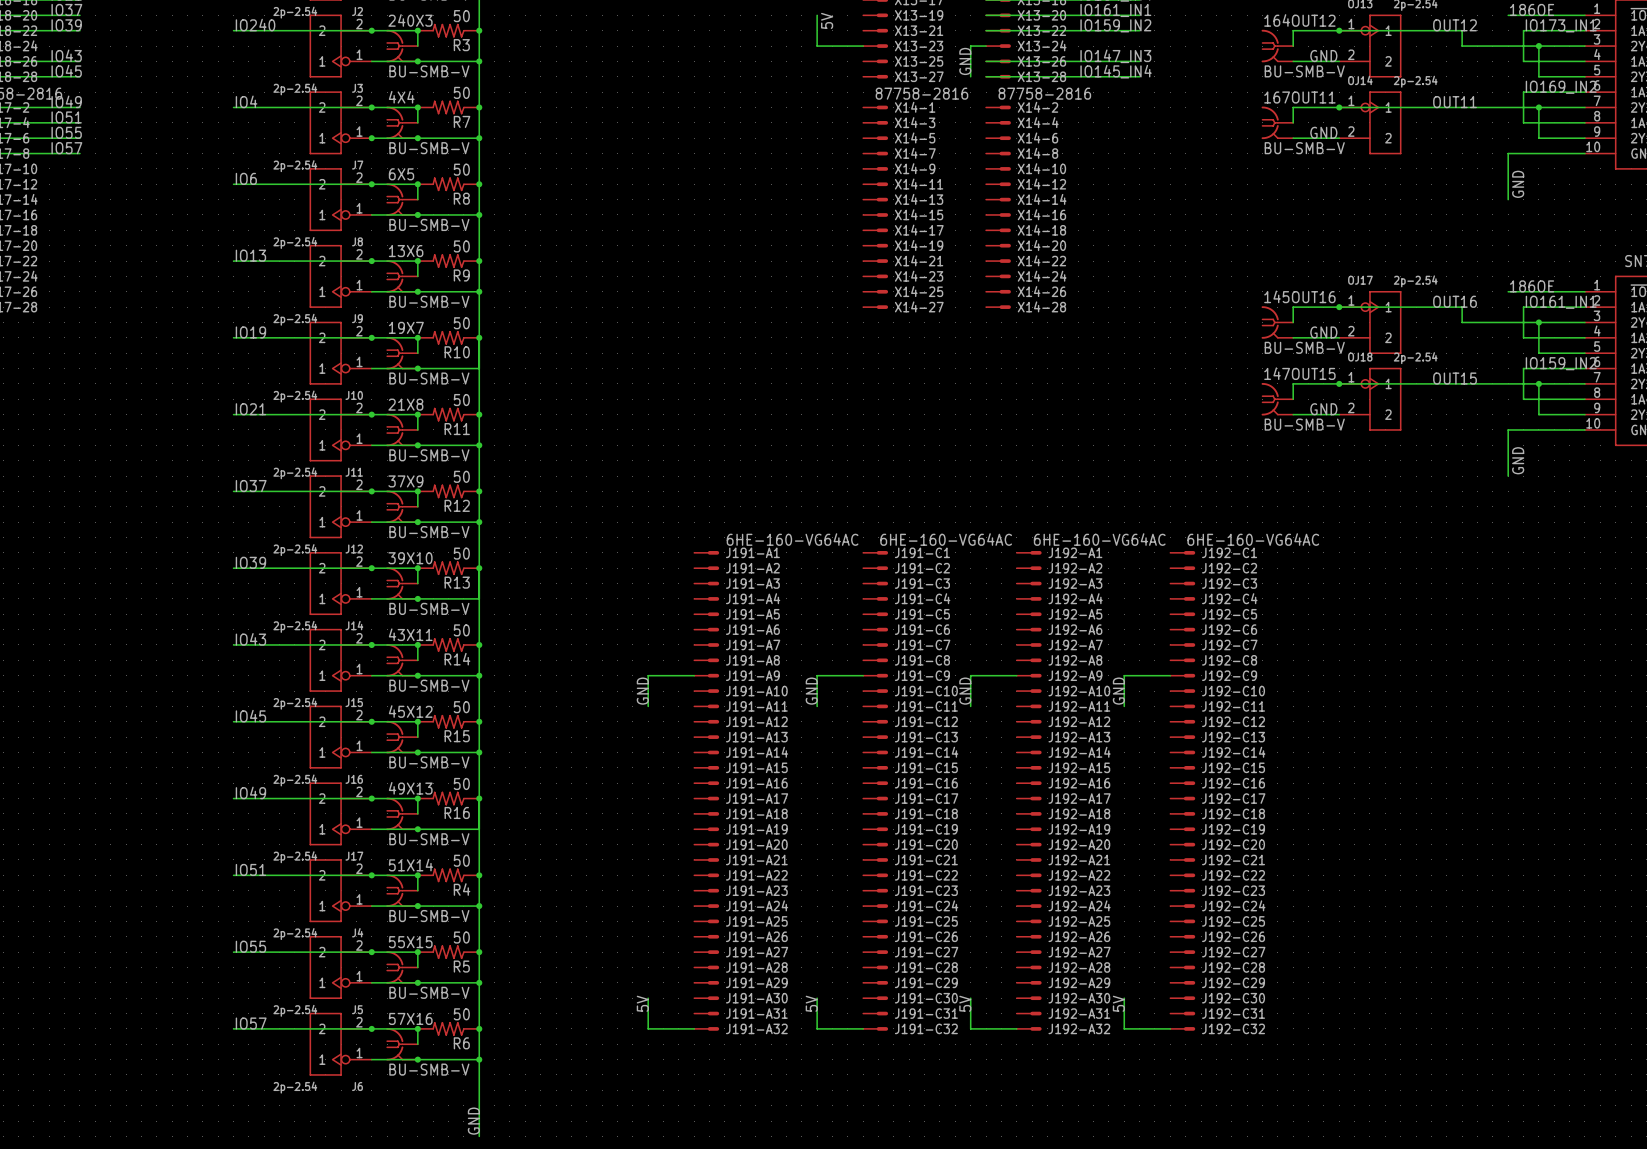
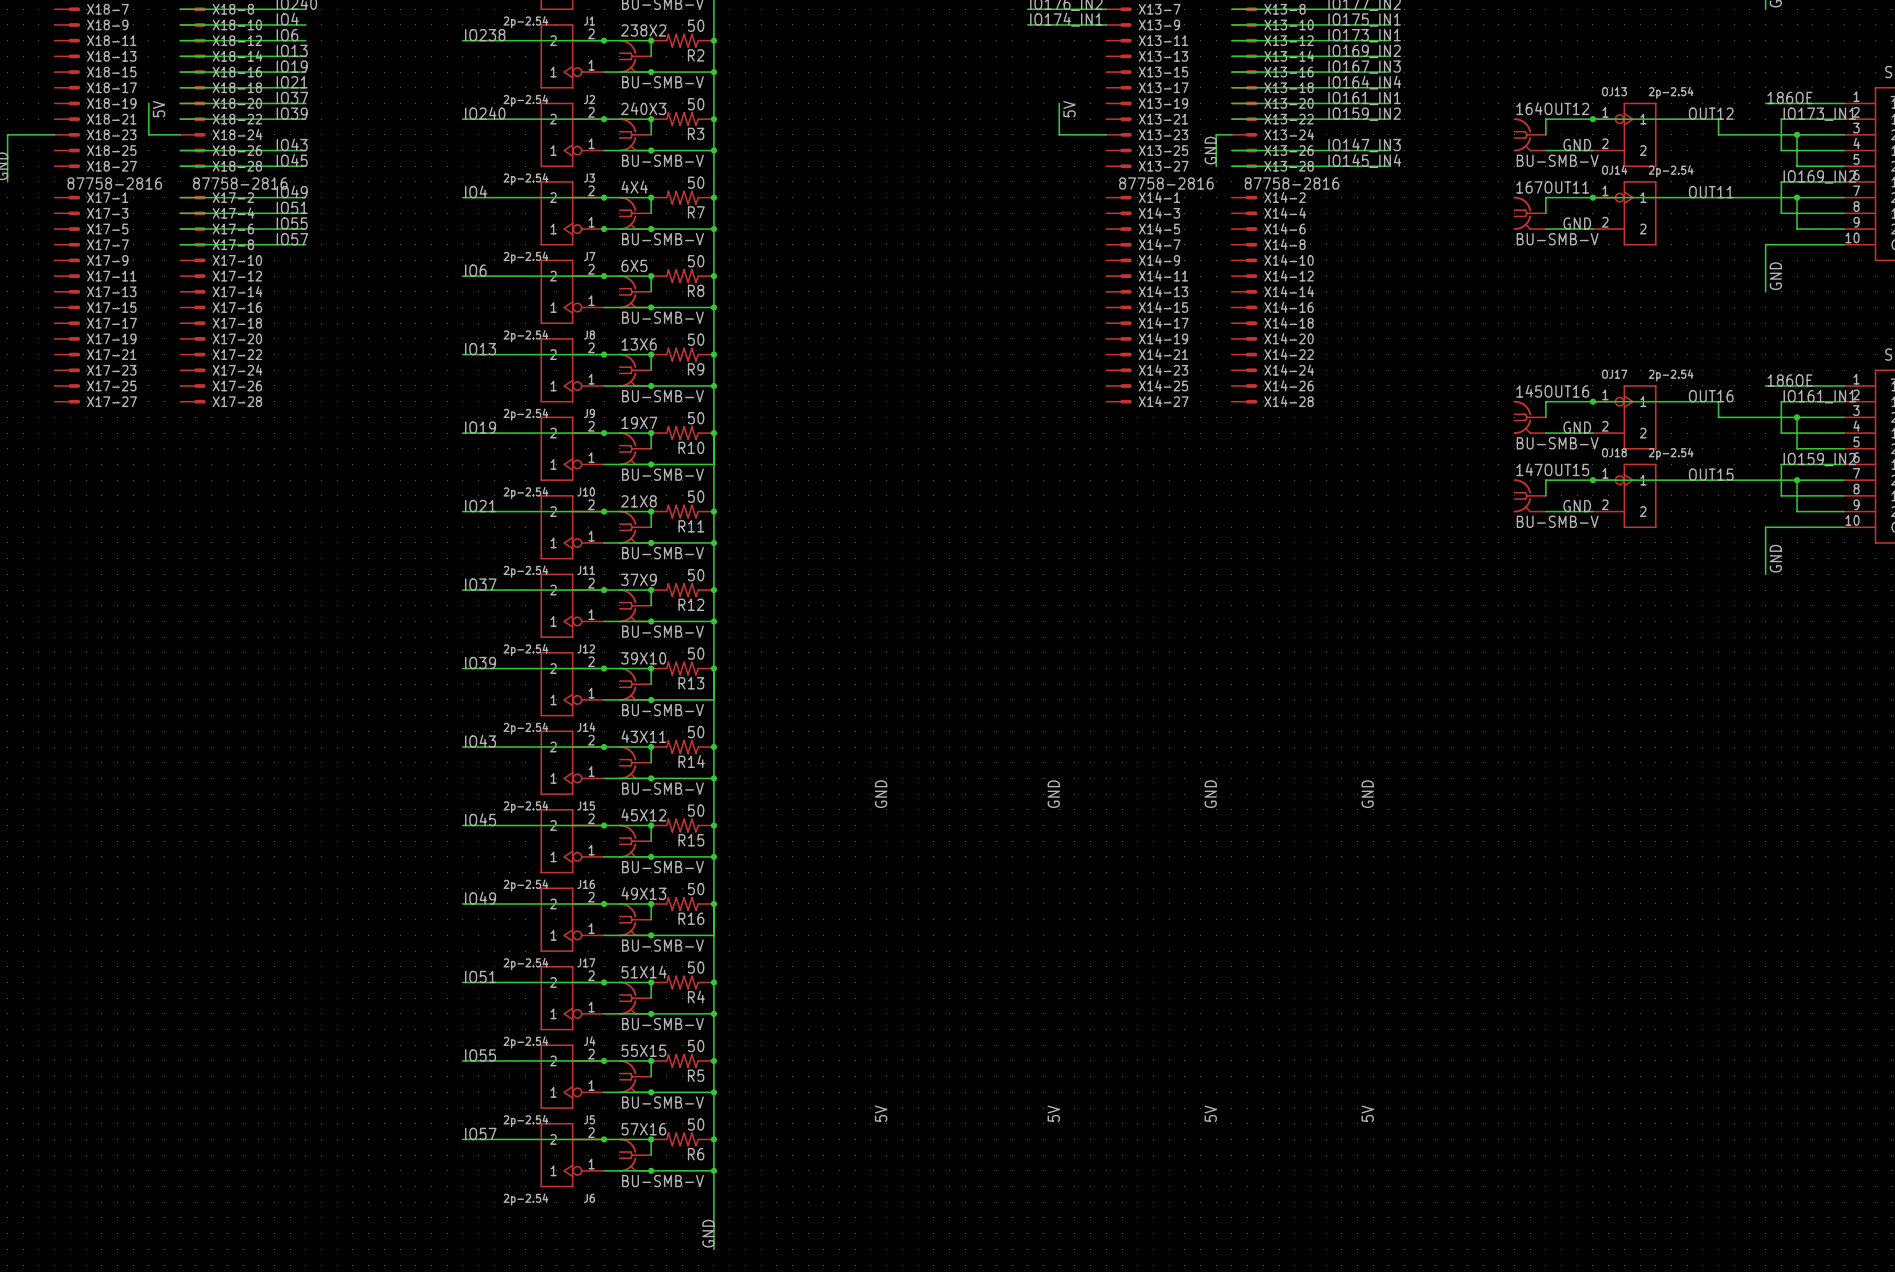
J191-A1: 6HE-160-VG64AC (706, 552) -> none
J191-C1: 6HE-160-VG64AC (875, 552) -> none
J192-A1: 6HE-160-VG64AC (1029, 552) -> none
J192-C1: 6HE-160-VG64AC (1182, 552) -> none
J191-A2: (706, 568) -> none
J191-C2: (875, 568) -> none
J192-A2: (1029, 568) -> none
J192-C2: (1182, 568) -> none
J191-A3: (706, 583) -> none
J191-C3: (875, 583) -> none
J192-A3: (1029, 583) -> none
J192-C3: (1182, 583) -> none
J191-A4: (706, 598) -> none
J191-C4: (875, 598) -> none
J192-A4: (1029, 598) -> none
J192-C4: (1182, 598) -> none
J191-A5: (706, 614) -> none
J191-C5: (875, 614) -> none
J192-A5: (1029, 614) -> none
J192-C5: (1182, 614) -> none
J191-A6: (706, 629) -> none
J191-C6: (875, 629) -> none
J192-A6: (1029, 629) -> none
J192-C6: (1182, 629) -> none
J191-A7: (706, 644) -> none
J191-C7: (875, 644) -> none
J192-A7: (1029, 644) -> none
J192-C7: (1182, 644) -> none
J191-A8: (706, 660) -> none
J191-C8: (875, 660) -> none
J192-A8: (1029, 660) -> none
J192-C8: (1182, 660) -> none
wire: (694, 675) (648, 675) (648, 706) -> none
J191-A9: (706, 675) -> none
wire: (863, 675) (817, 675) (817, 706) -> none
J191-C9: (875, 675) -> none
wire: (1016, 675) (970, 675) (970, 706) -> none
J192-A9: (1029, 675) -> none
wire: (1170, 675) (1124, 675) (1124, 706) -> none
J192-C9: (1182, 675) -> none
J191-A10: (706, 691) -> none
J191-C10: (875, 691) -> none
J192-A10: (1029, 691) -> none
J192-C10: (1182, 691) -> none
J191-A11: (706, 706) -> none
J191-C11: (875, 706) -> none
J192-A11: (1029, 706) -> none
J192-C11: (1182, 706) -> none
J191-A12: (706, 721) -> none
J191-C12: (875, 721) -> none
J192-A12: (1029, 721) -> none
J192-C12: (1182, 721) -> none
J191-A13: (706, 737) -> none
J191-C13: (875, 737) -> none
J192-A13: (1029, 737) -> none
J192-C13: (1182, 737) -> none
J191-A14: (706, 752) -> none
J191-C14: (875, 752) -> none
J192-A14: (1029, 752) -> none
J192-C14: (1182, 752) -> none
J191-A15: (706, 767) -> none
J191-C15: (875, 767) -> none
J192-A15: (1029, 767) -> none
J192-C15: (1182, 767) -> none
J191-A16: (706, 783) -> none
J191-C16: (875, 783) -> none
J192-A16: (1029, 783) -> none
J192-C16: (1182, 783) -> none
J191-A17: (706, 798) -> none
J191-C17: (875, 798) -> none
J192-A17: (1029, 798) -> none
J192-C17: (1182, 798) -> none
J191-A18: (706, 813) -> none
J191-C18: (875, 813) -> none
J192-A18: (1029, 813) -> none
J192-C18: (1182, 813) -> none
J191-A19: (706, 829) -> none
J191-C19: (875, 829) -> none
J192-A19: (1029, 829) -> none
J192-C19: (1182, 829) -> none
J191-A20: (706, 844) -> none
J191-C20: (875, 844) -> none
J192-A20: (1029, 844) -> none
J192-C20: (1182, 844) -> none
J191-A21: (706, 859) -> none
J191-C21: (875, 859) -> none
J192-A21: (1029, 859) -> none
J192-C21: (1182, 859) -> none
J191-A22: (706, 875) -> none
J191-C22: (875, 875) -> none
J192-A22: (1029, 875) -> none
J192-C22: (1182, 875) -> none
J191-A23: (706, 890) -> none
J191-C23: (875, 890) -> none
J192-A23: (1029, 890) -> none
J192-C23: (1182, 890) -> none
J191-A24: (706, 906) -> none
J191-C24: (875, 906) -> none
J192-A24: (1029, 906) -> none
J192-C24: (1182, 906) -> none
J191-A25: (706, 921) -> none
J191-C25: (875, 921) -> none
J192-A25: (1029, 921) -> none
J192-C25: (1182, 921) -> none
J191-A26: (706, 936) -> none
J191-C26: (875, 936) -> none
J192-A26: (1029, 936) -> none
J192-C26: (1182, 936) -> none
J191-A27: (706, 952) -> none
J191-C27: (875, 952) -> none
J192-A27: (1029, 952) -> none
J192-C27: (1182, 952) -> none
J191-A28: (706, 967) -> none
J191-C28: (875, 967) -> none
J192-A28: (1029, 967) -> none
J192-C28: (1182, 967) -> none
J191-A29: (706, 982) -> none
J191-C29: (875, 982) -> none
J192-A29: (1029, 982) -> none
J192-C29: (1182, 982) -> none
wire: (648, 998) (648, 1028) (694, 1028) -> none
J191-A30: (706, 998) -> none
wire: (817, 998) (817, 1028) (863, 1028) -> none
J191-C30: (875, 998) -> none
wire: (970, 998) (970, 1028) (1016, 1028) -> none
J192-A30: (1029, 998) -> none
wire: (1124, 998) (1124, 1028) (1170, 1028) -> none
J192-C30: (1182, 998) -> none
J191-A31: (706, 1013) -> none
J191-C31: (875, 1013) -> none
J192-A31: (1029, 1013) -> none
J192-C31: (1182, 1013) -> none
J191-A32: (706, 1028) -> none
J191-C32: (875, 1028) -> none
J192-A32: (1029, 1028) -> none
J192-C32: (1182, 1028) -> none

